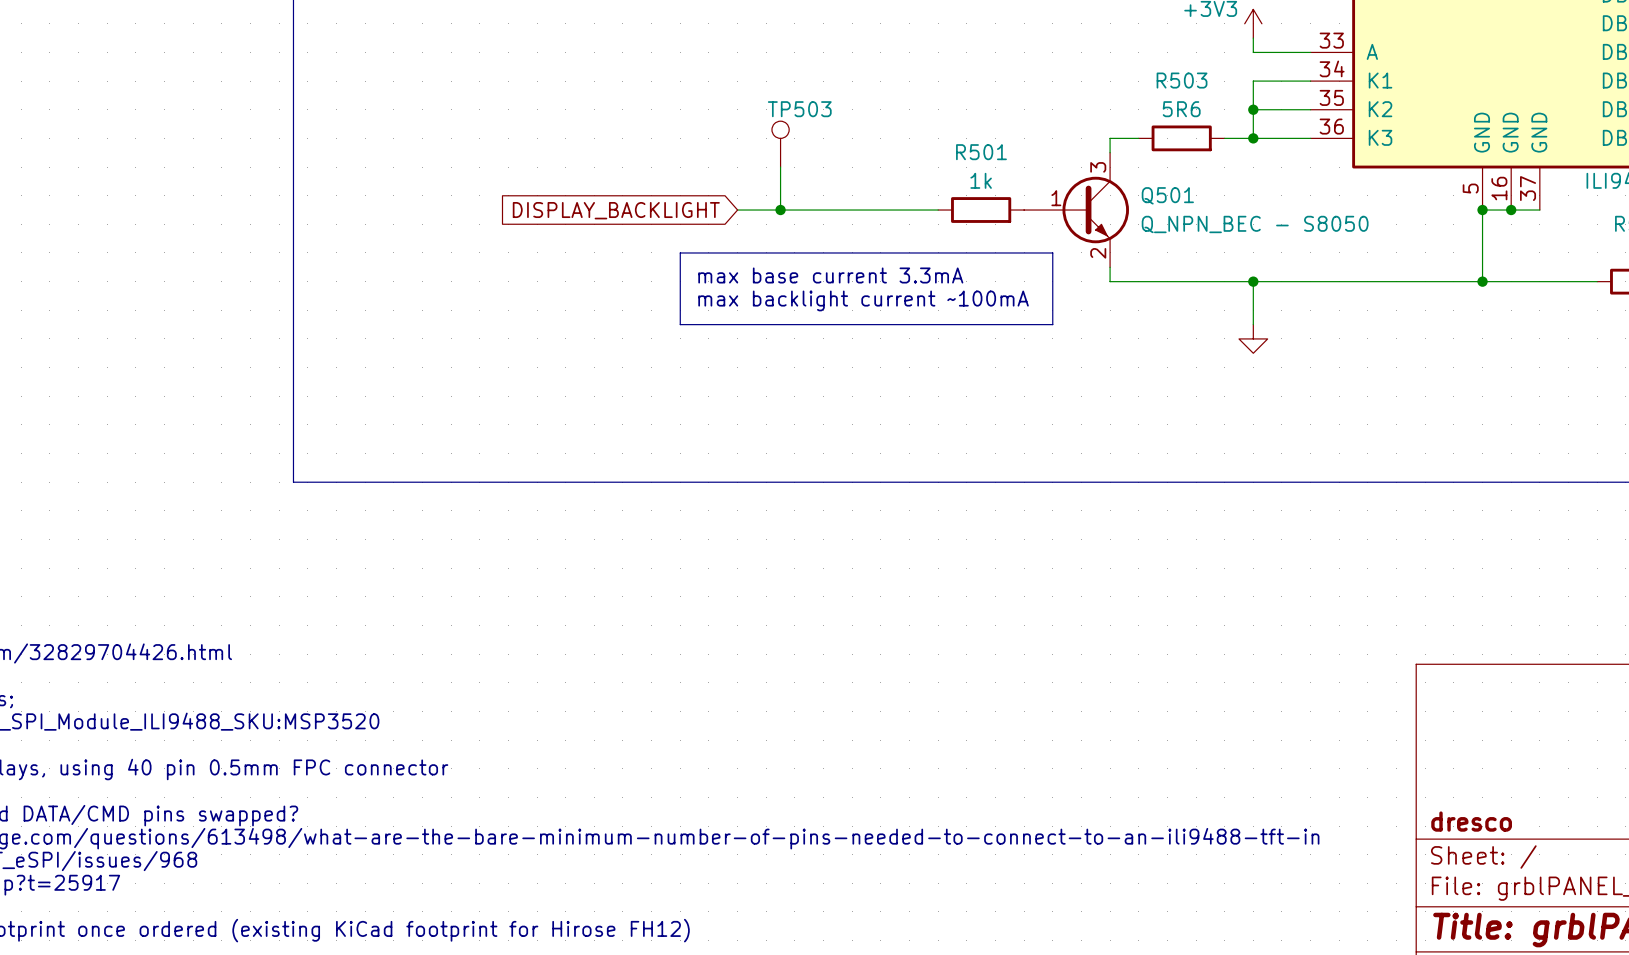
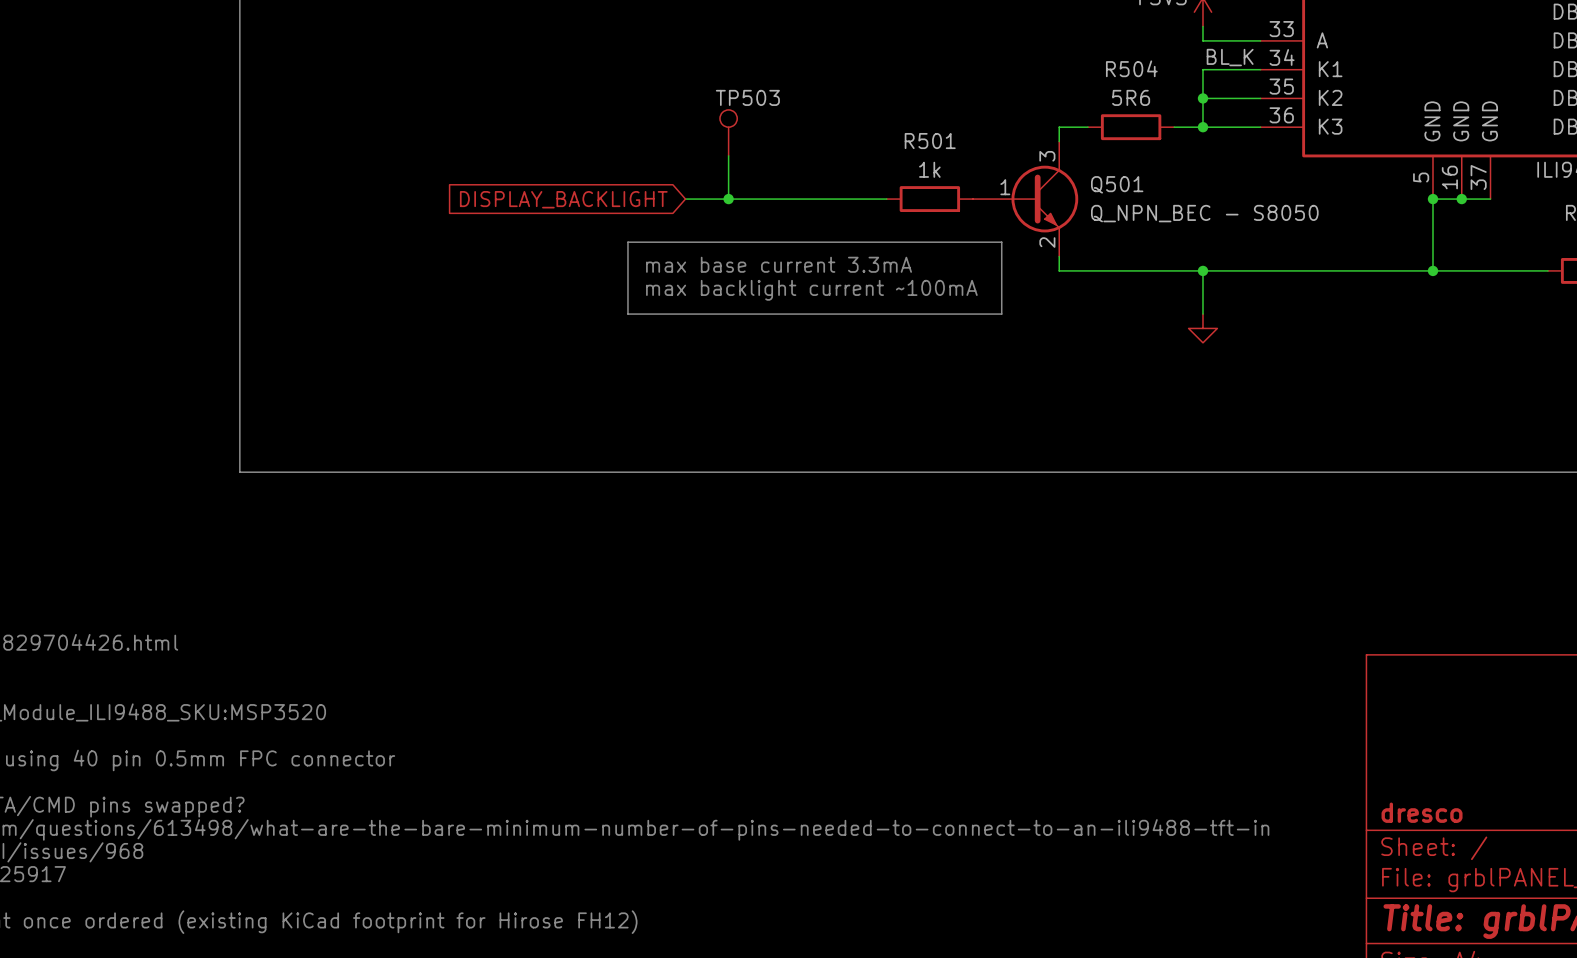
label: none -> BL_K (1230, 57)
R503 name: R503 (1182, 80) -> R504 (1131, 68)

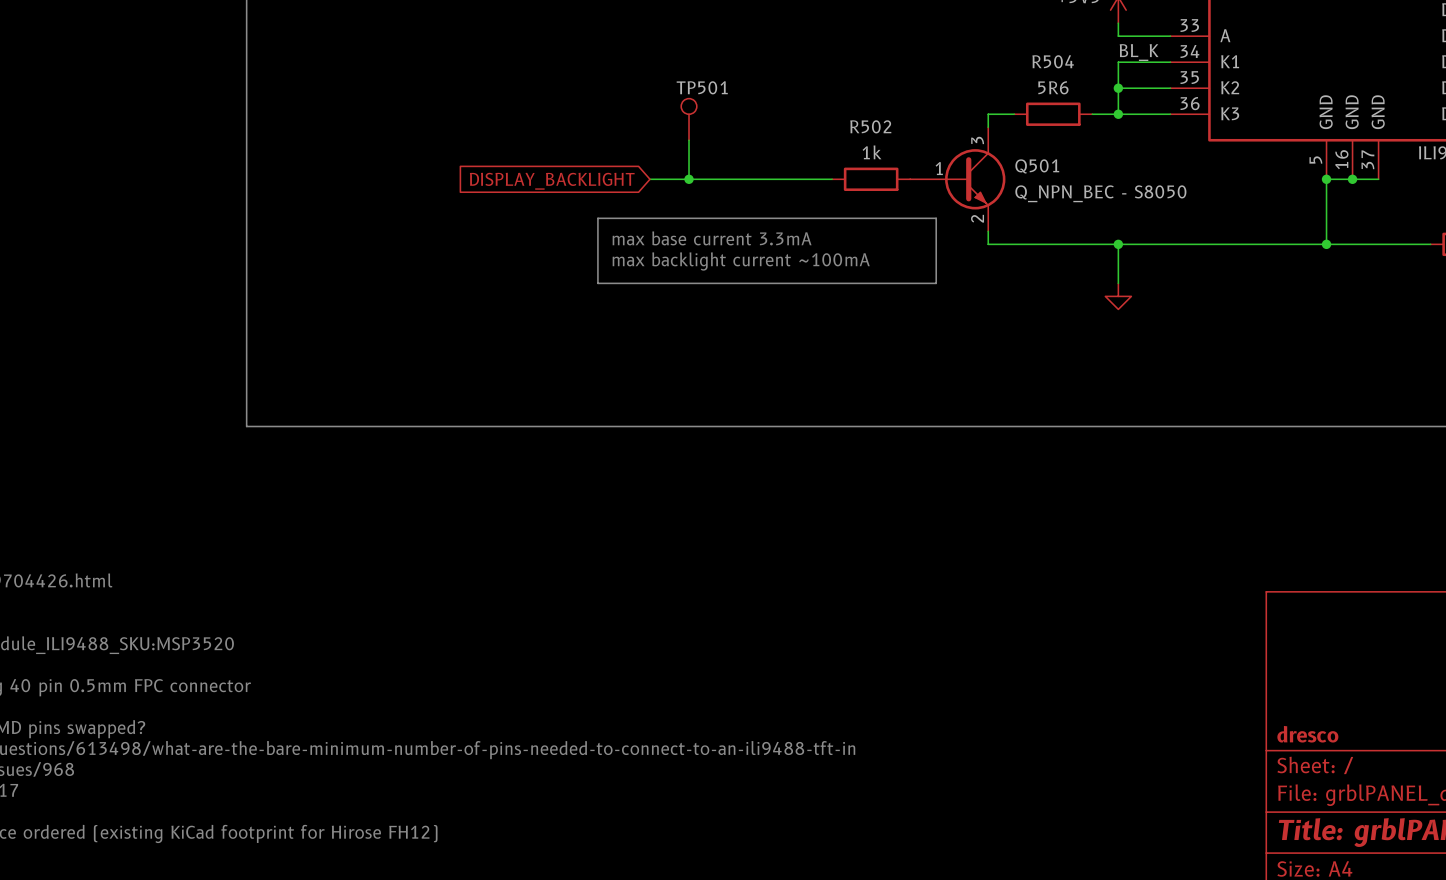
TP503 name: TP503 (747, 97) -> TP501 (702, 87)
R501 name: R501 (930, 141) -> R502 (870, 126)

